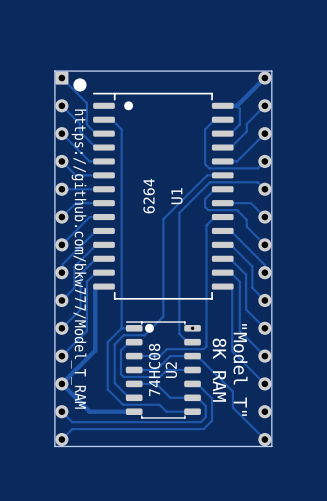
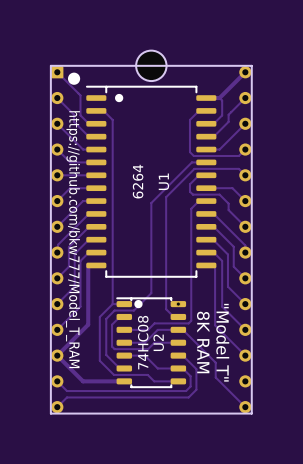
part: none -> (151, 65)

